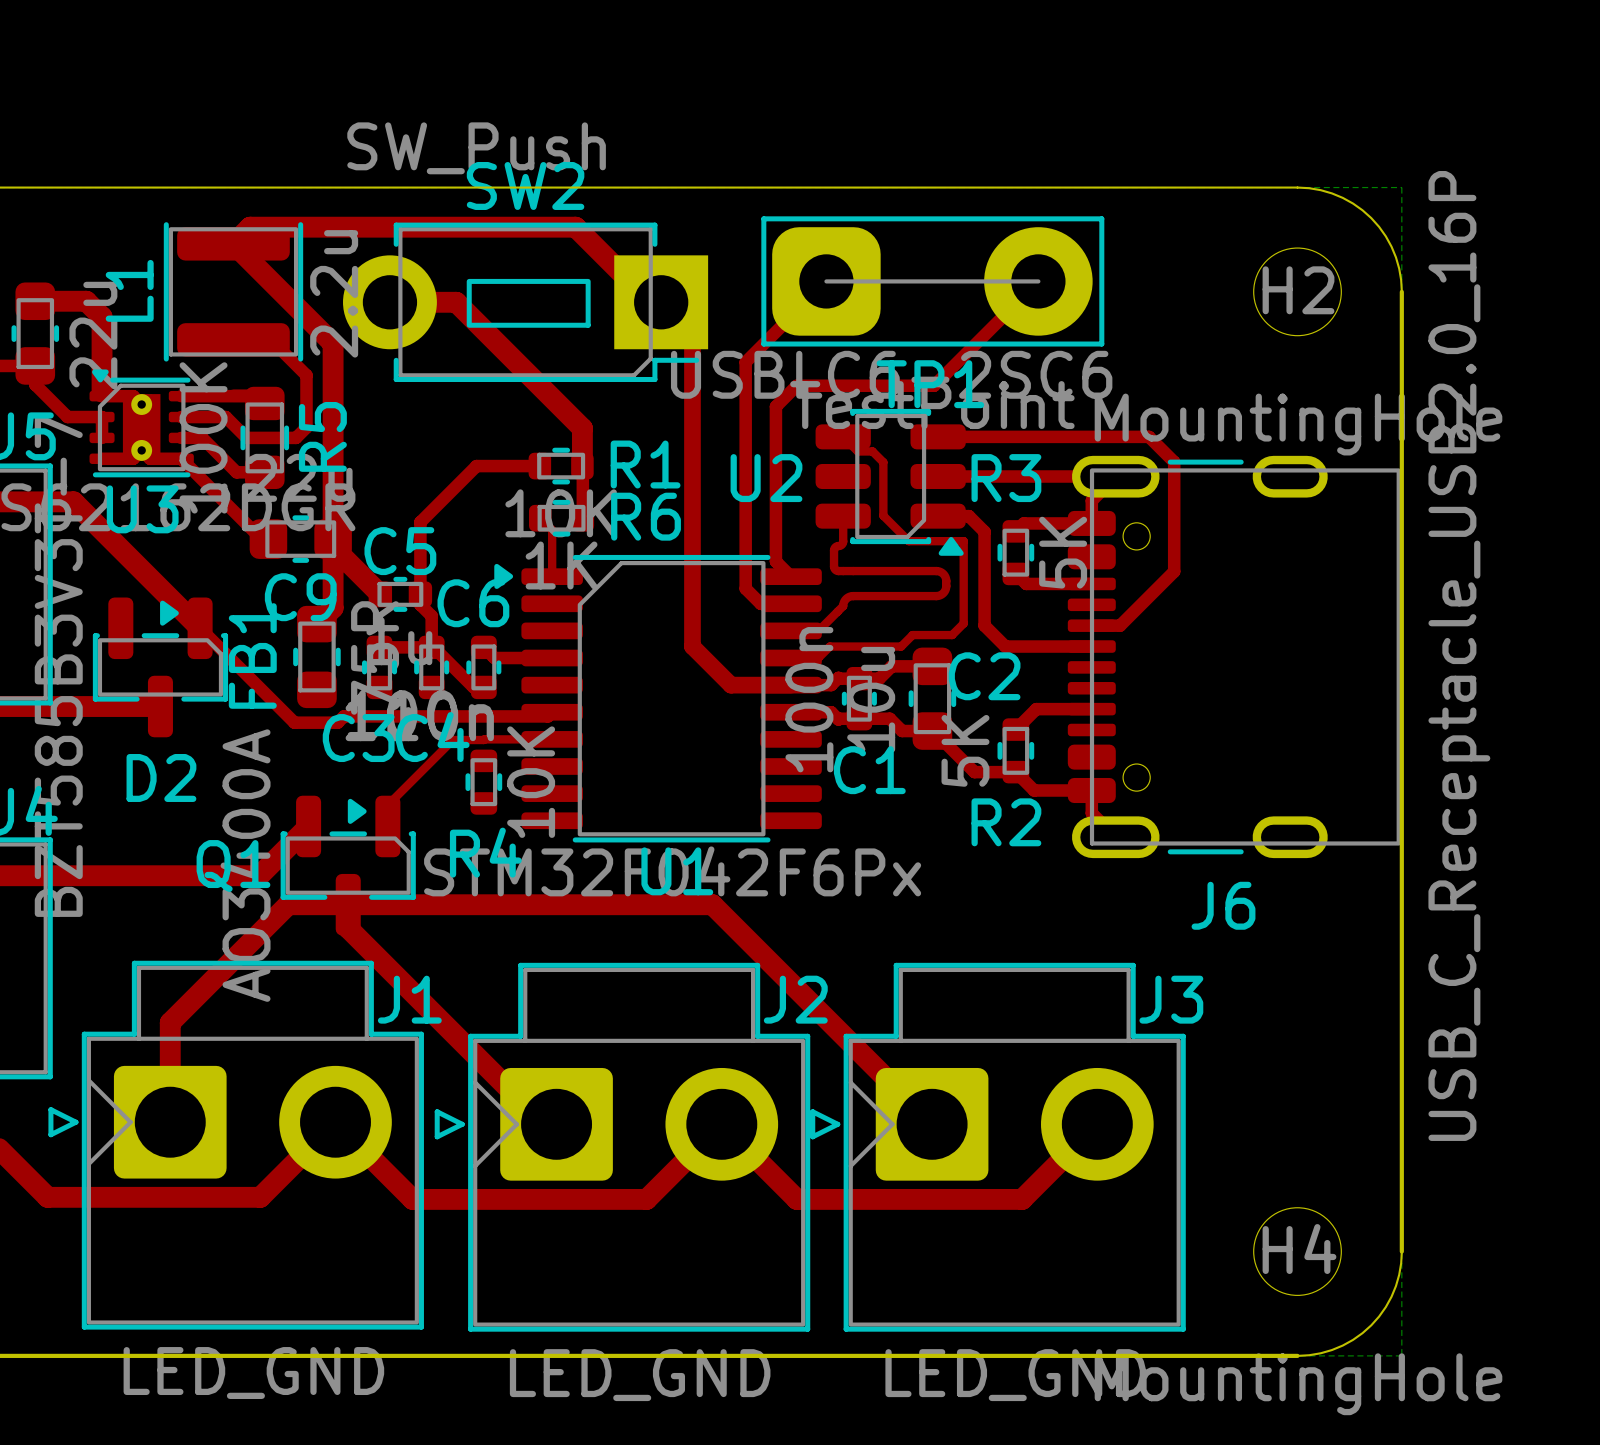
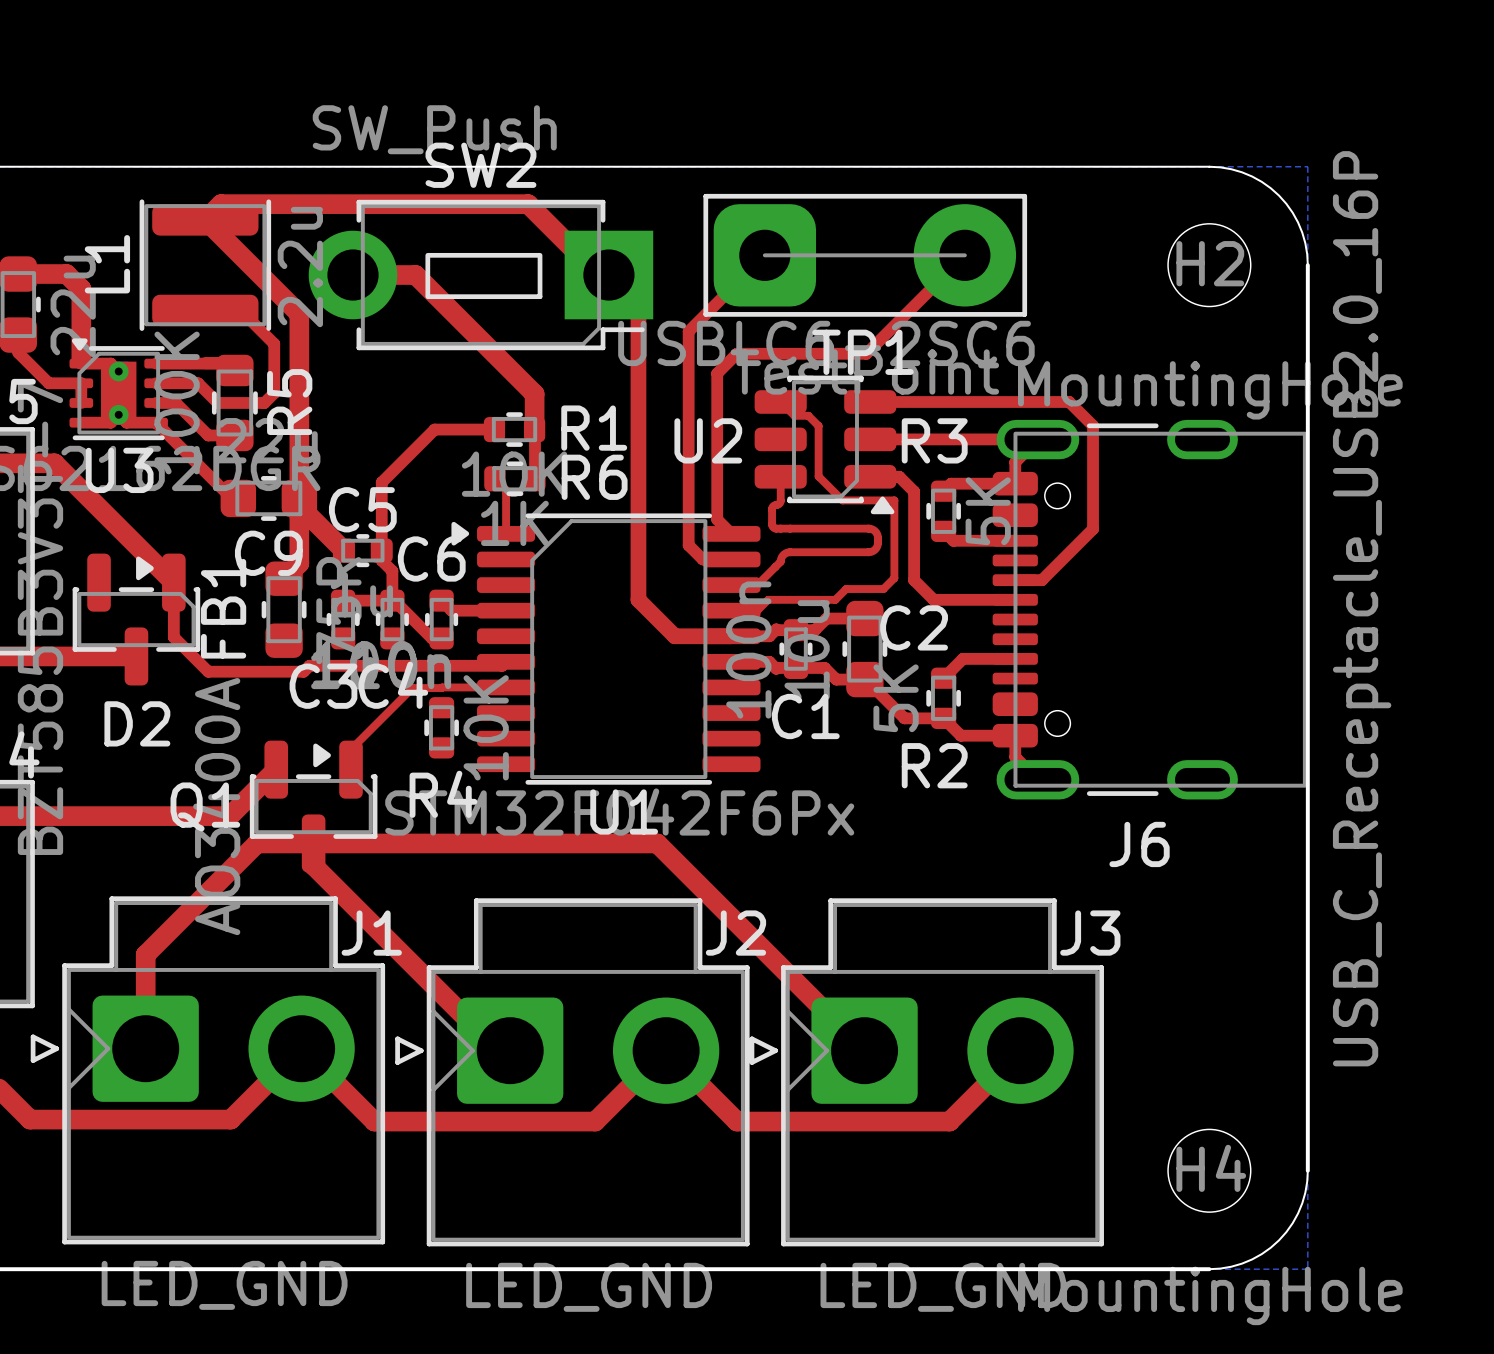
top track: (200, 628) (294, 722) -> (173, 582) (173, 637) (208, 671) (262, 671)

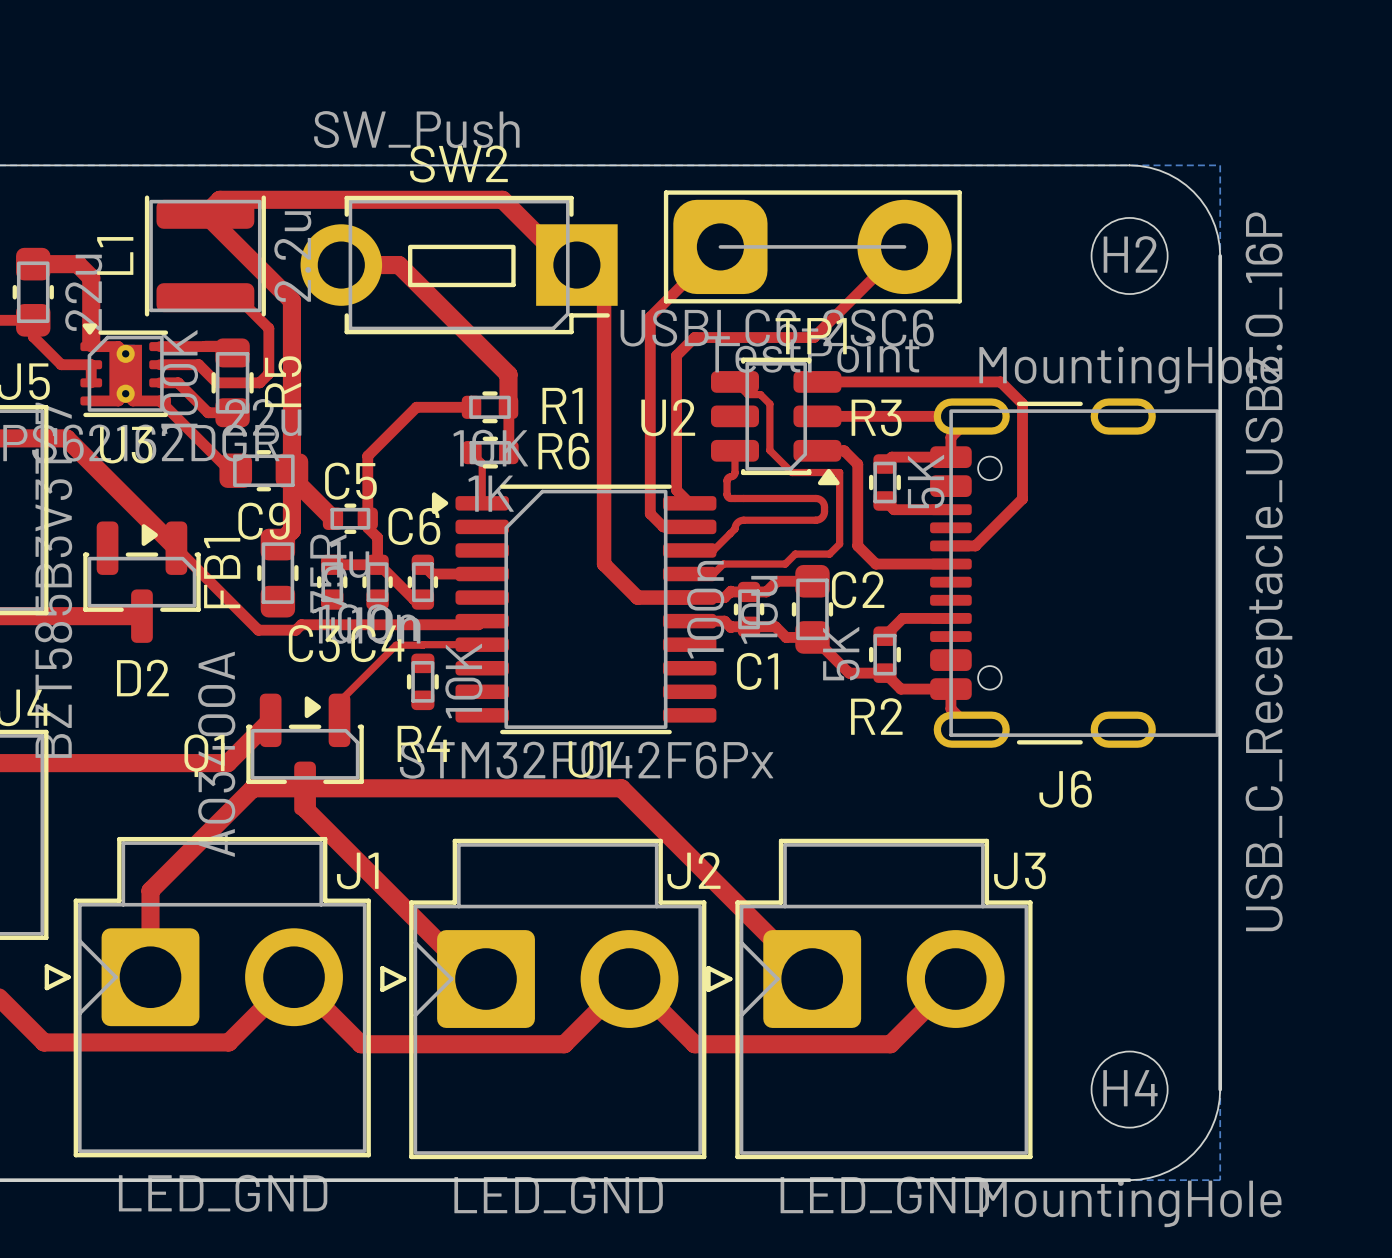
top track: (173, 582) (173, 637) (208, 671) (262, 671) -> (176, 548) (258, 630)

